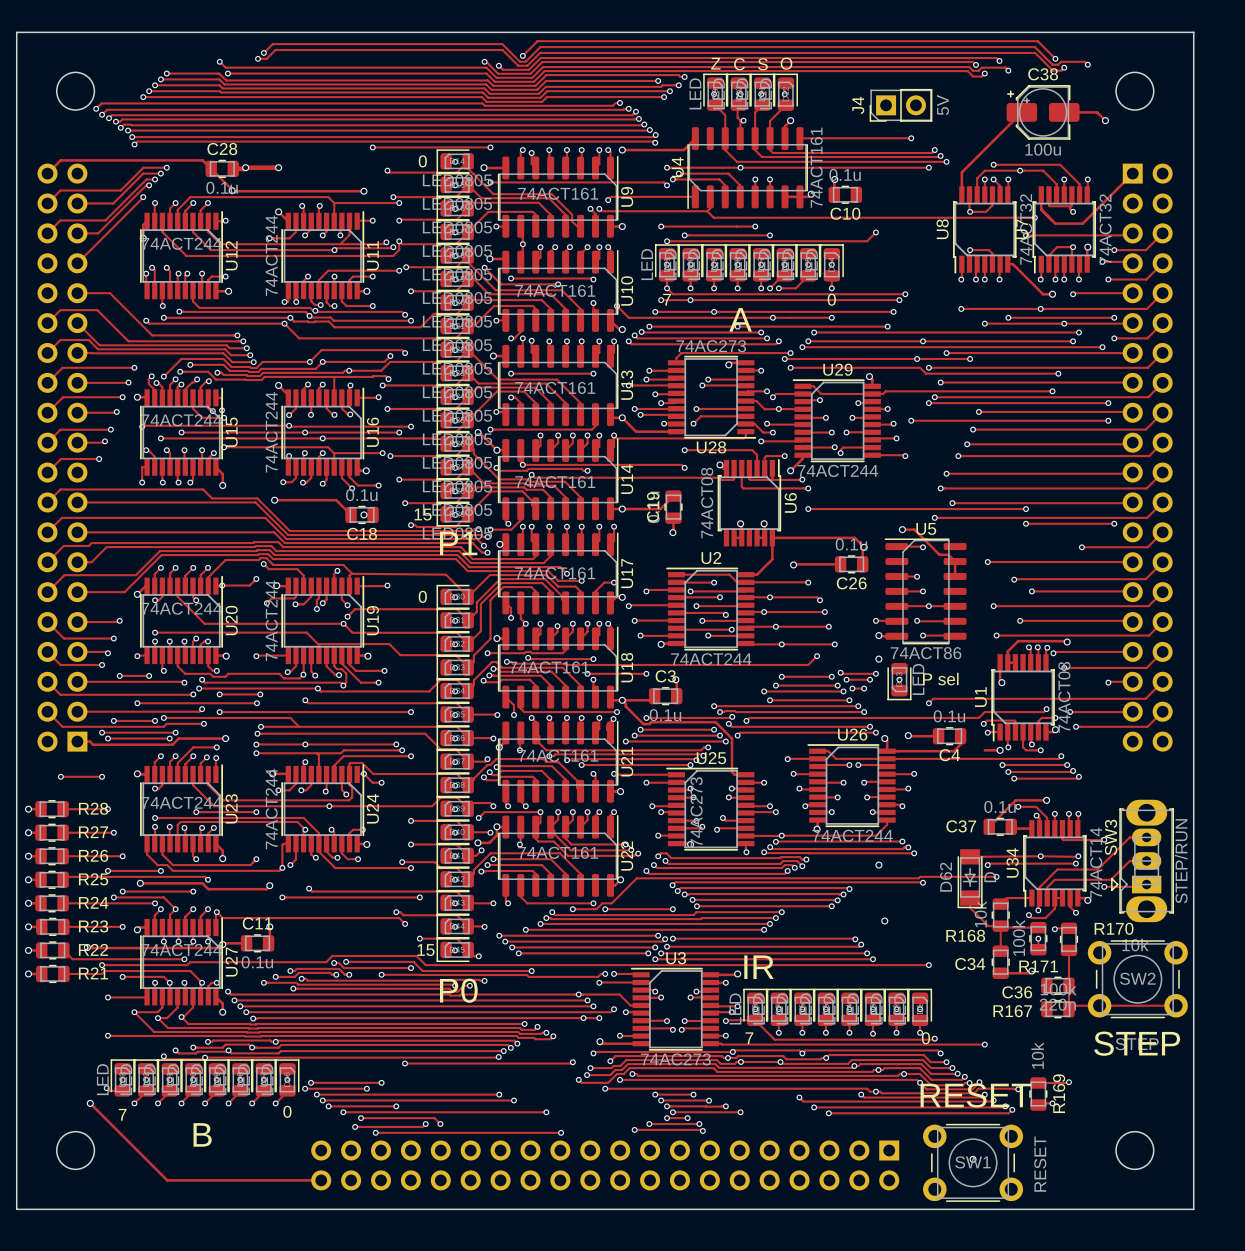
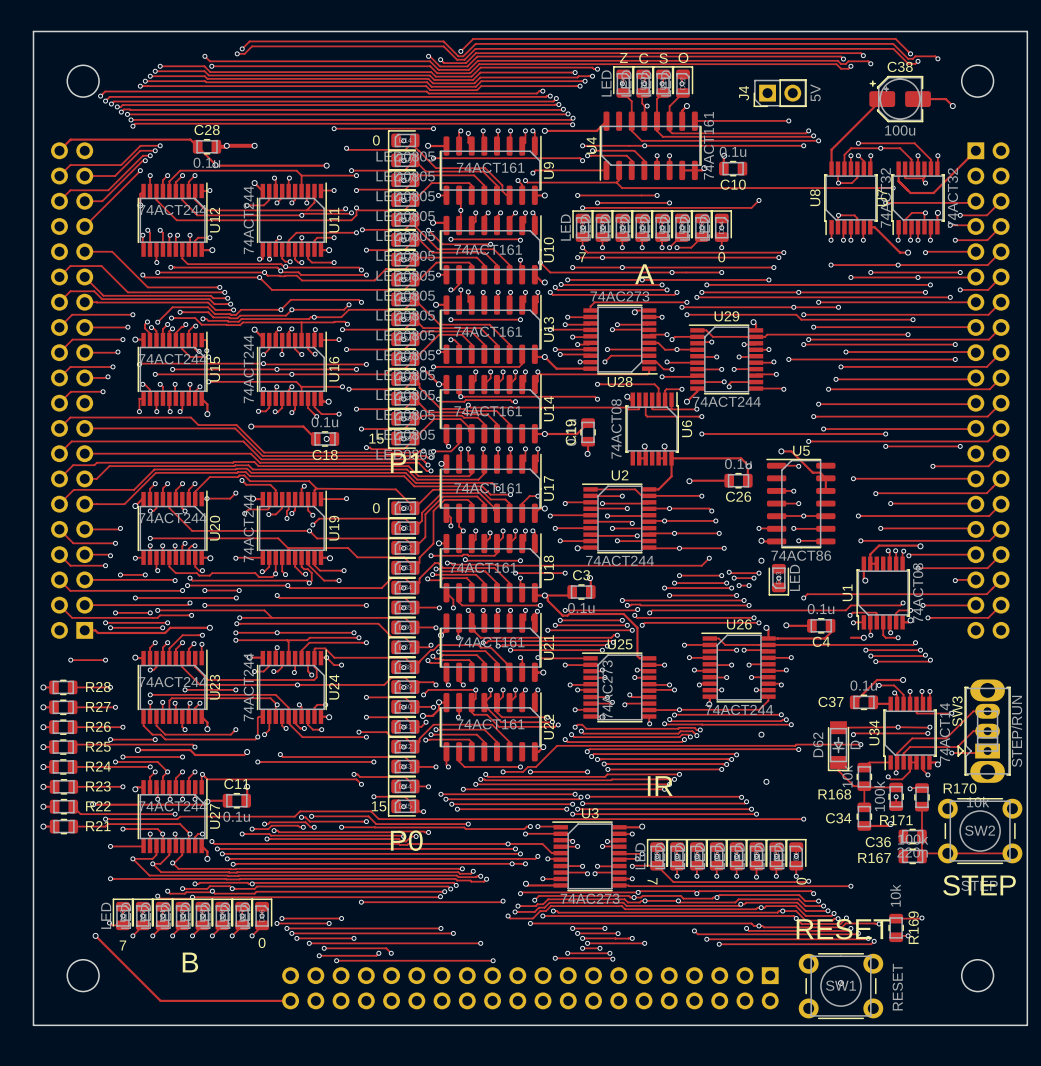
text: P sel (940, 679) -> none
text position: IR (759, 967) -> IR (660, 786)
text rotation: 0° (749, 1038) -> 90° clockwise (652, 881)
text rotation: 0° (925, 1038) -> 90° clockwise (801, 881)

